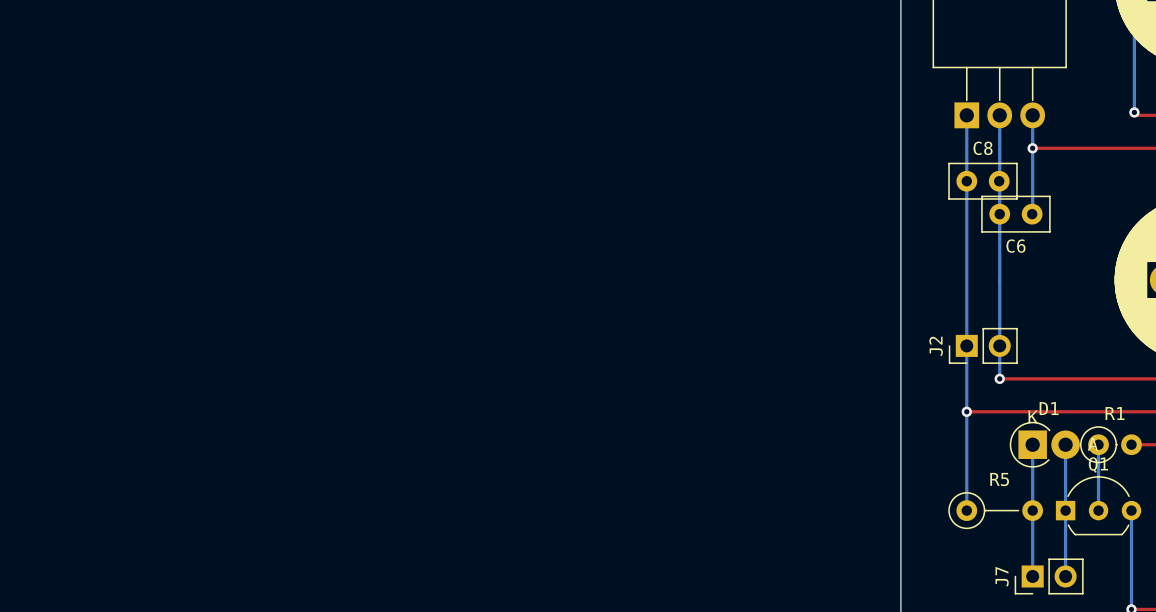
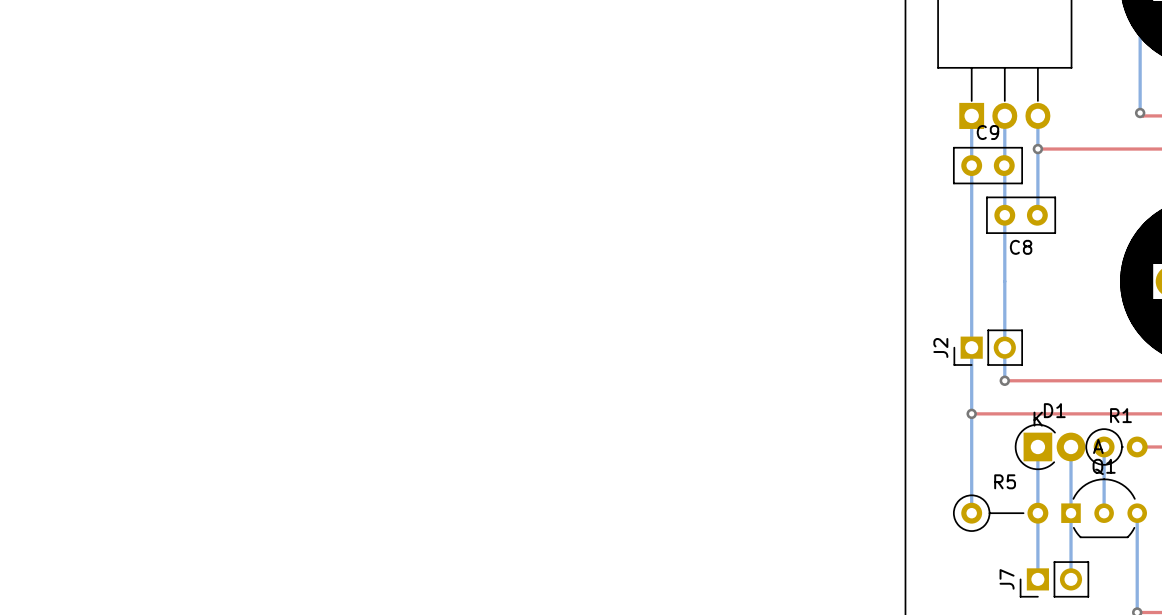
C9: none -> (987, 165)
C8: (983, 181) -> none
C6 name: C6 (1015, 246) -> C8 (1021, 247)

